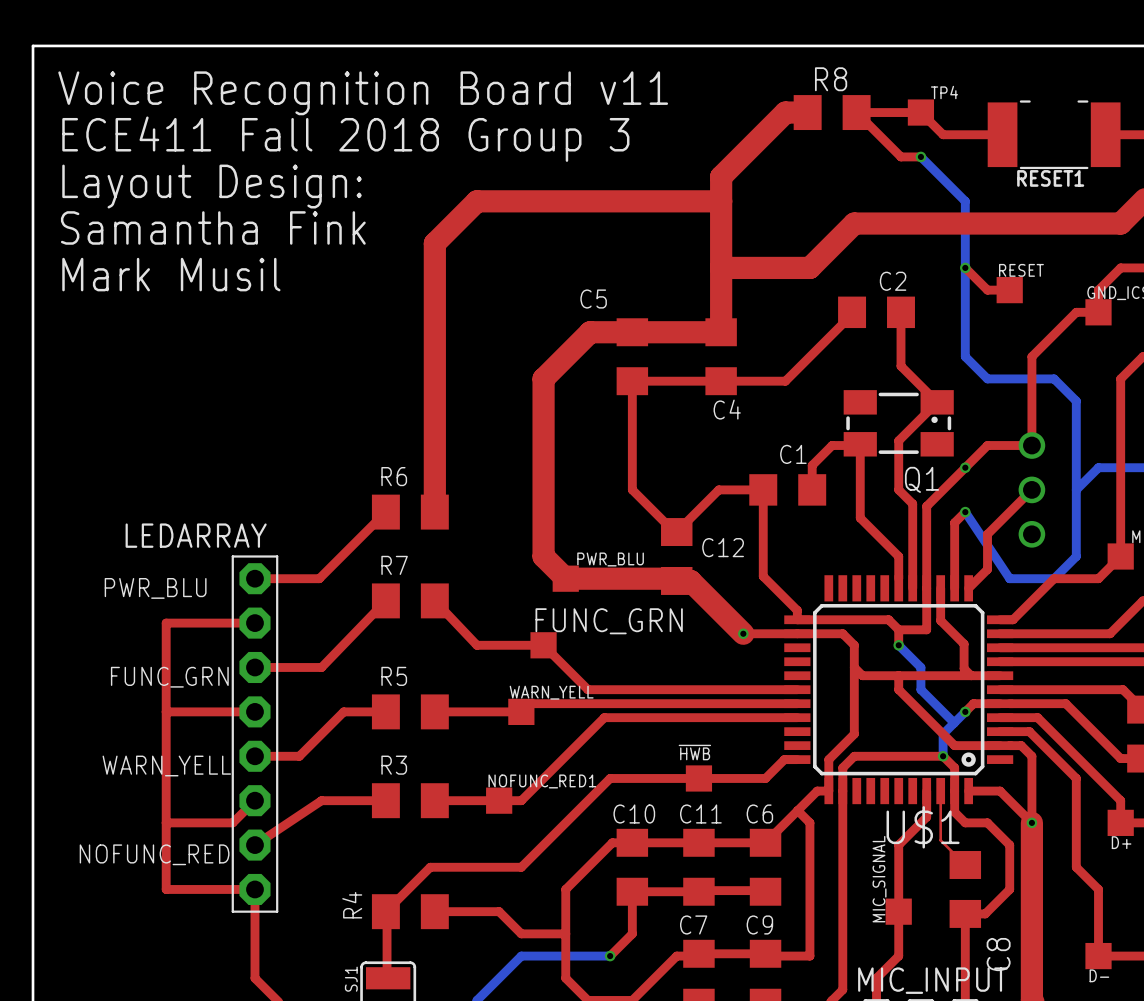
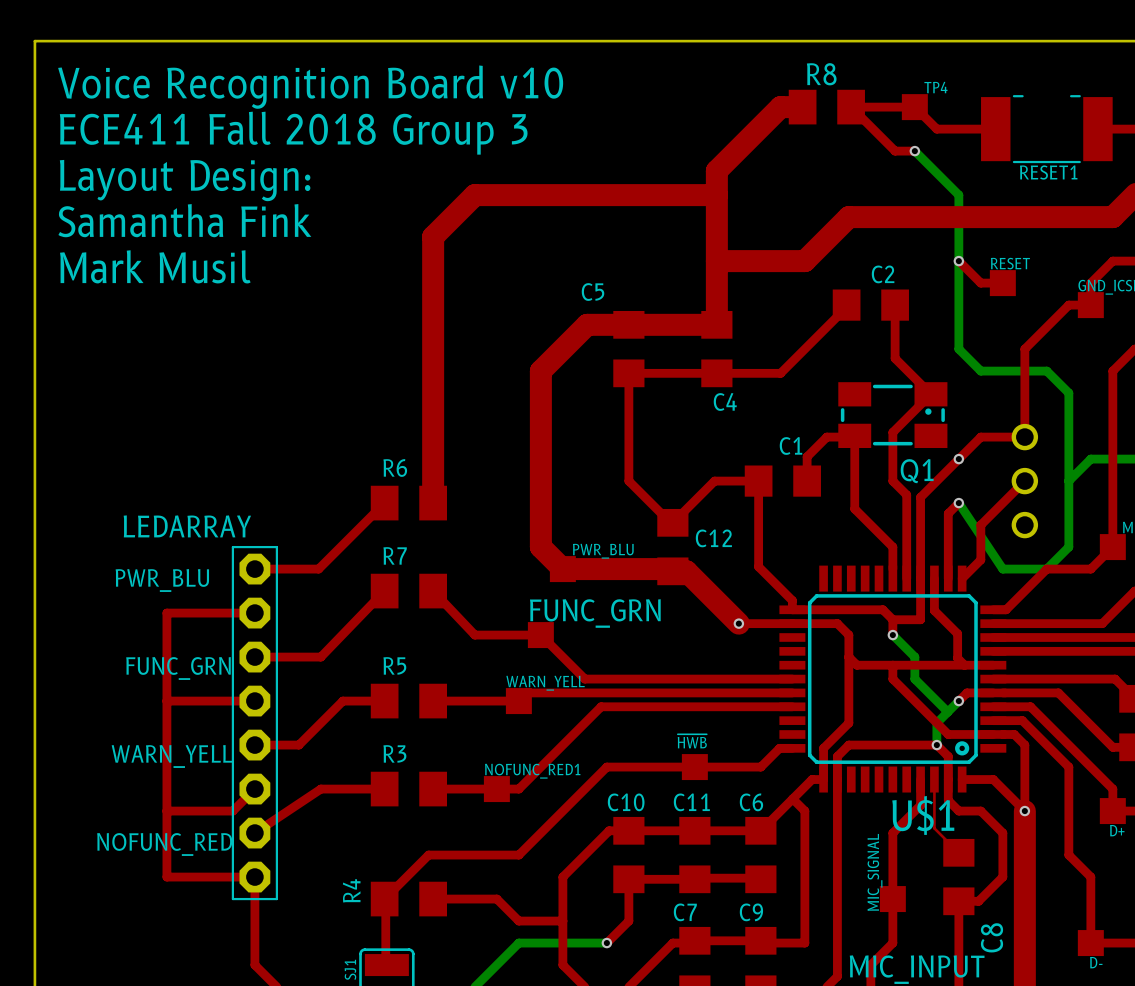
text: Voice Recognition Board v11 (363, 93) -> Voice Recognition Board v10 (310, 87)

